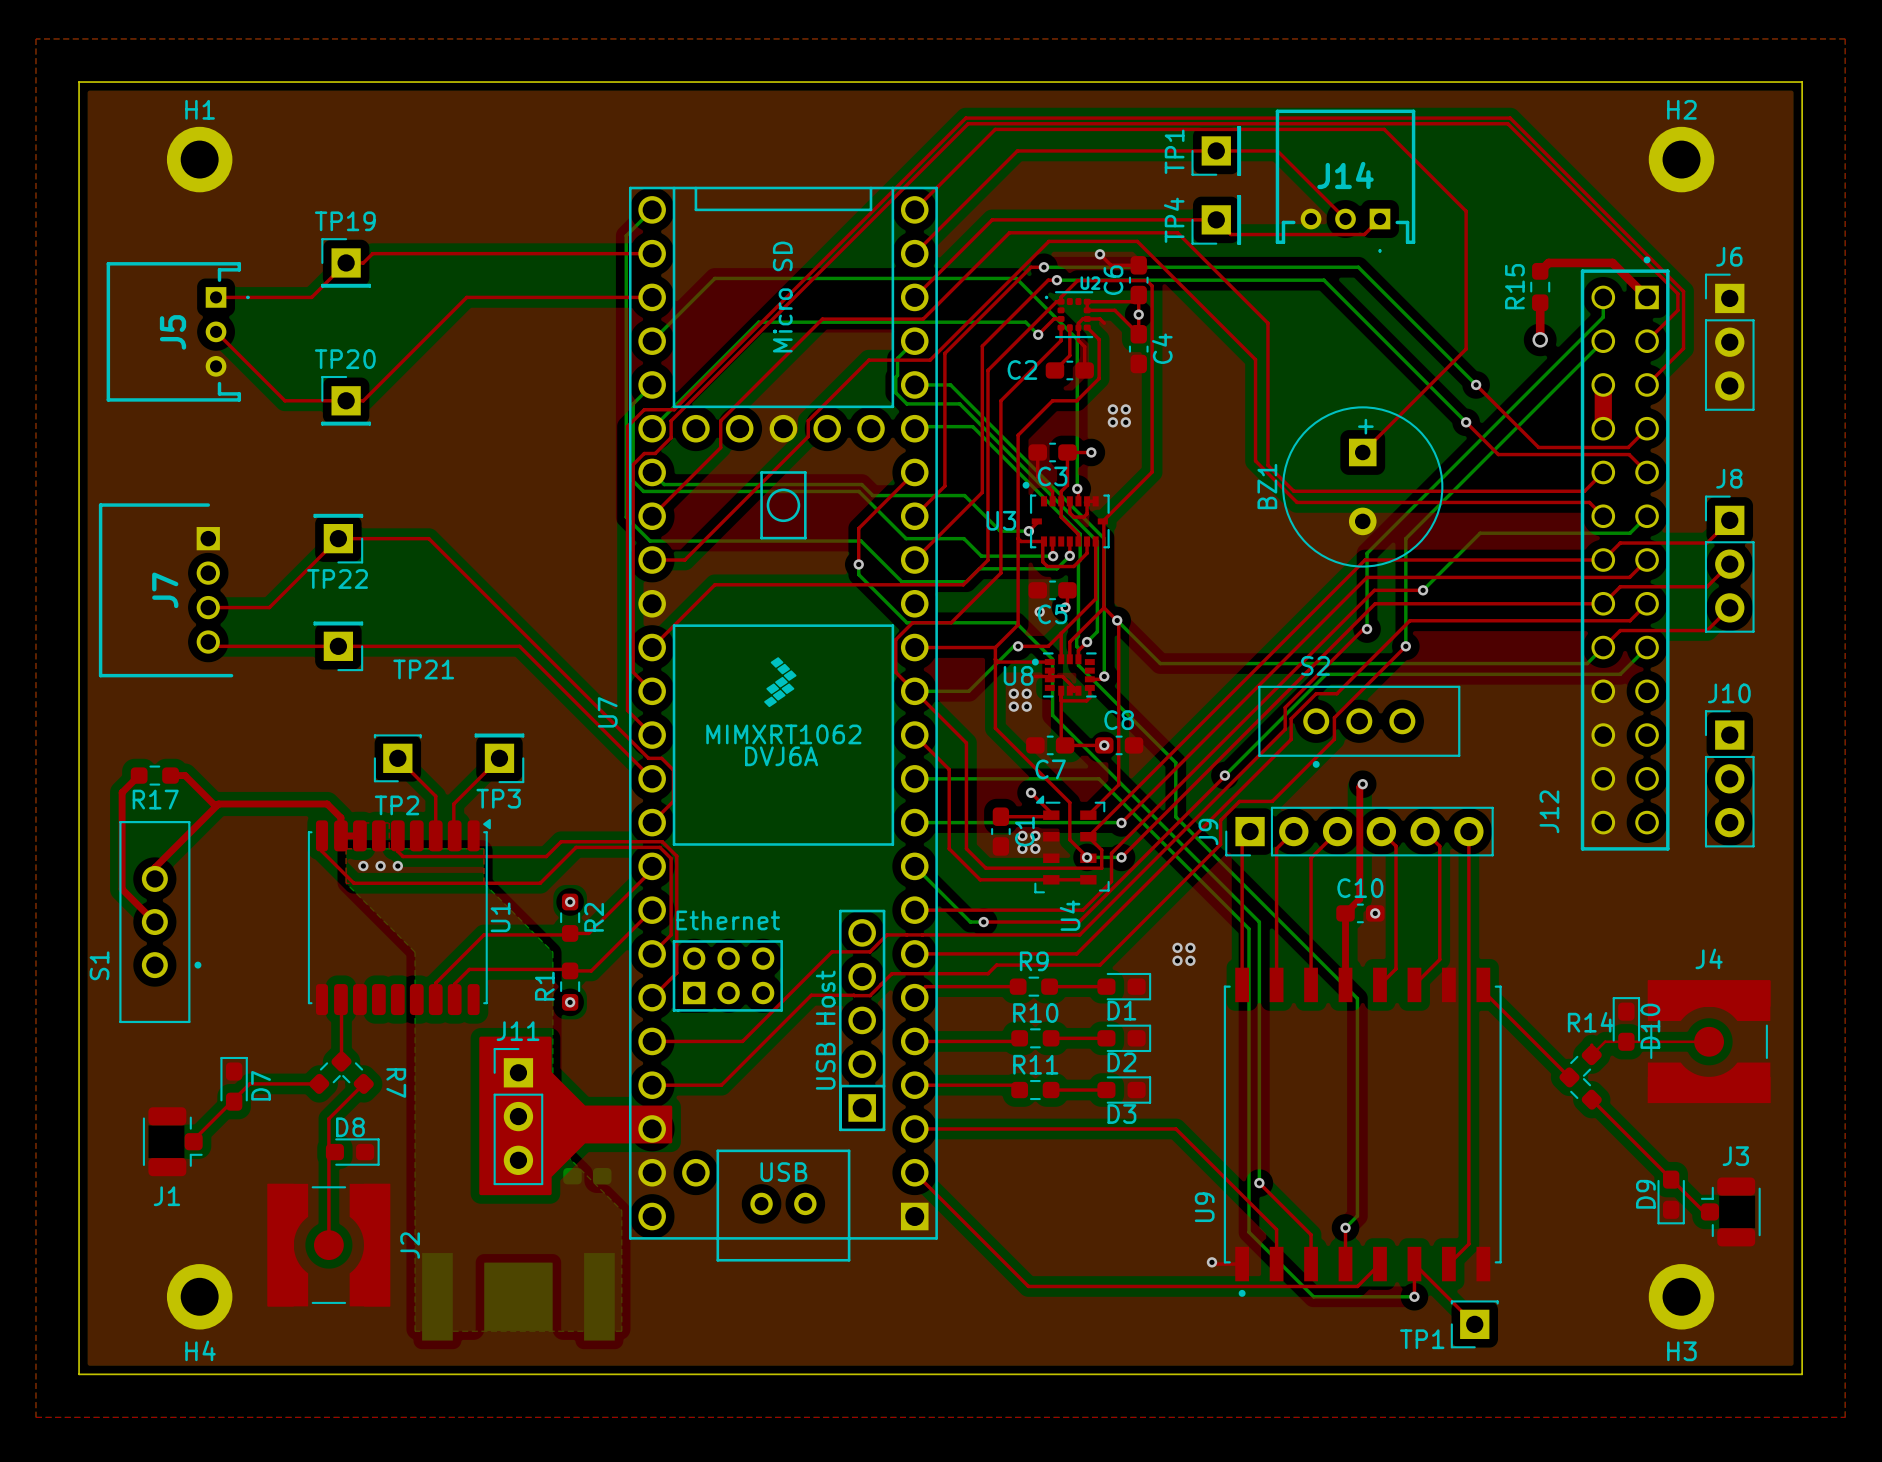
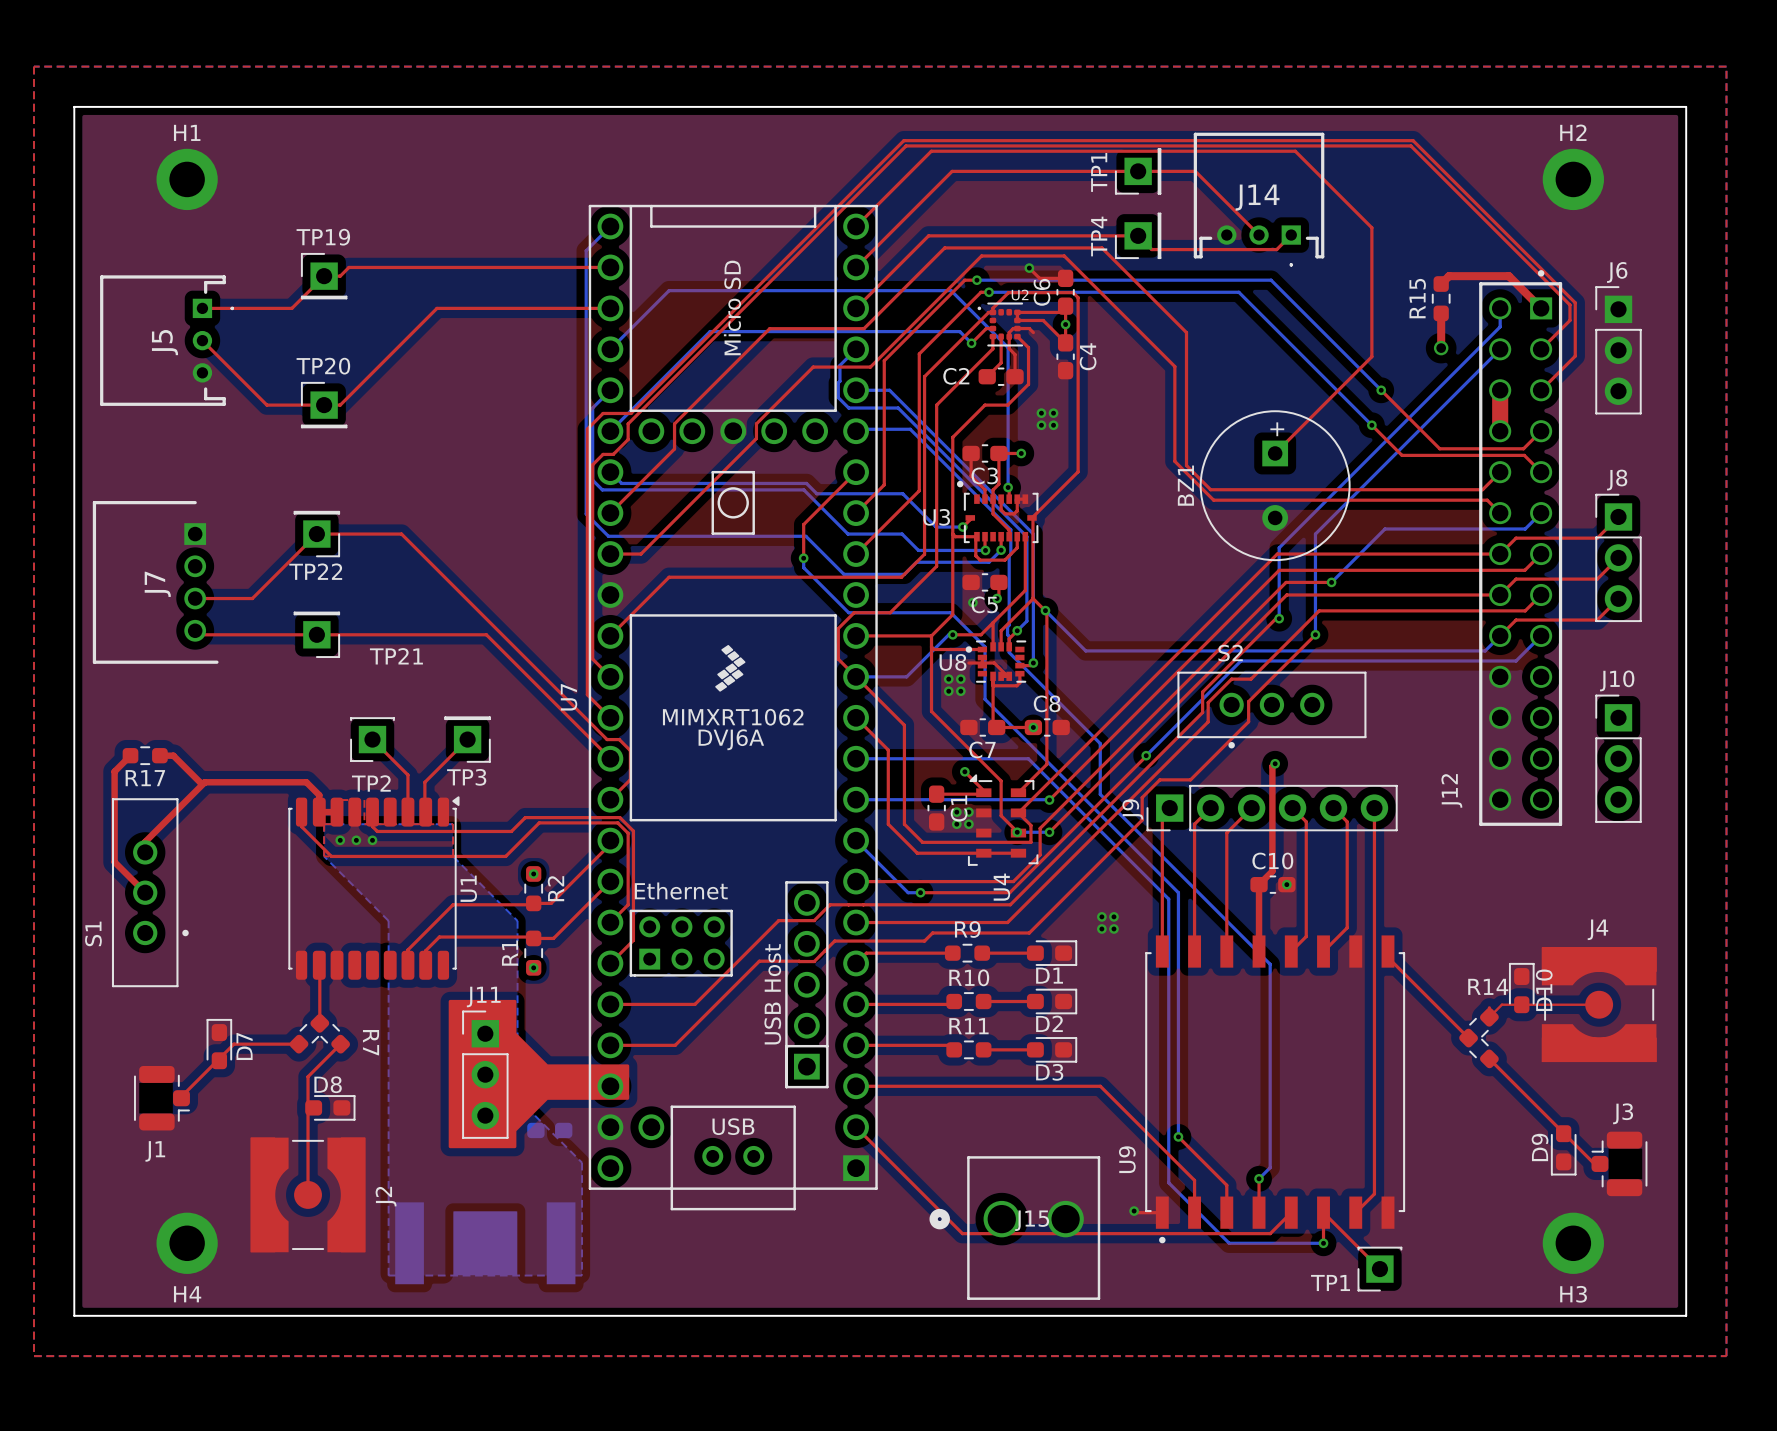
J15: none -> (1014, 1228)

